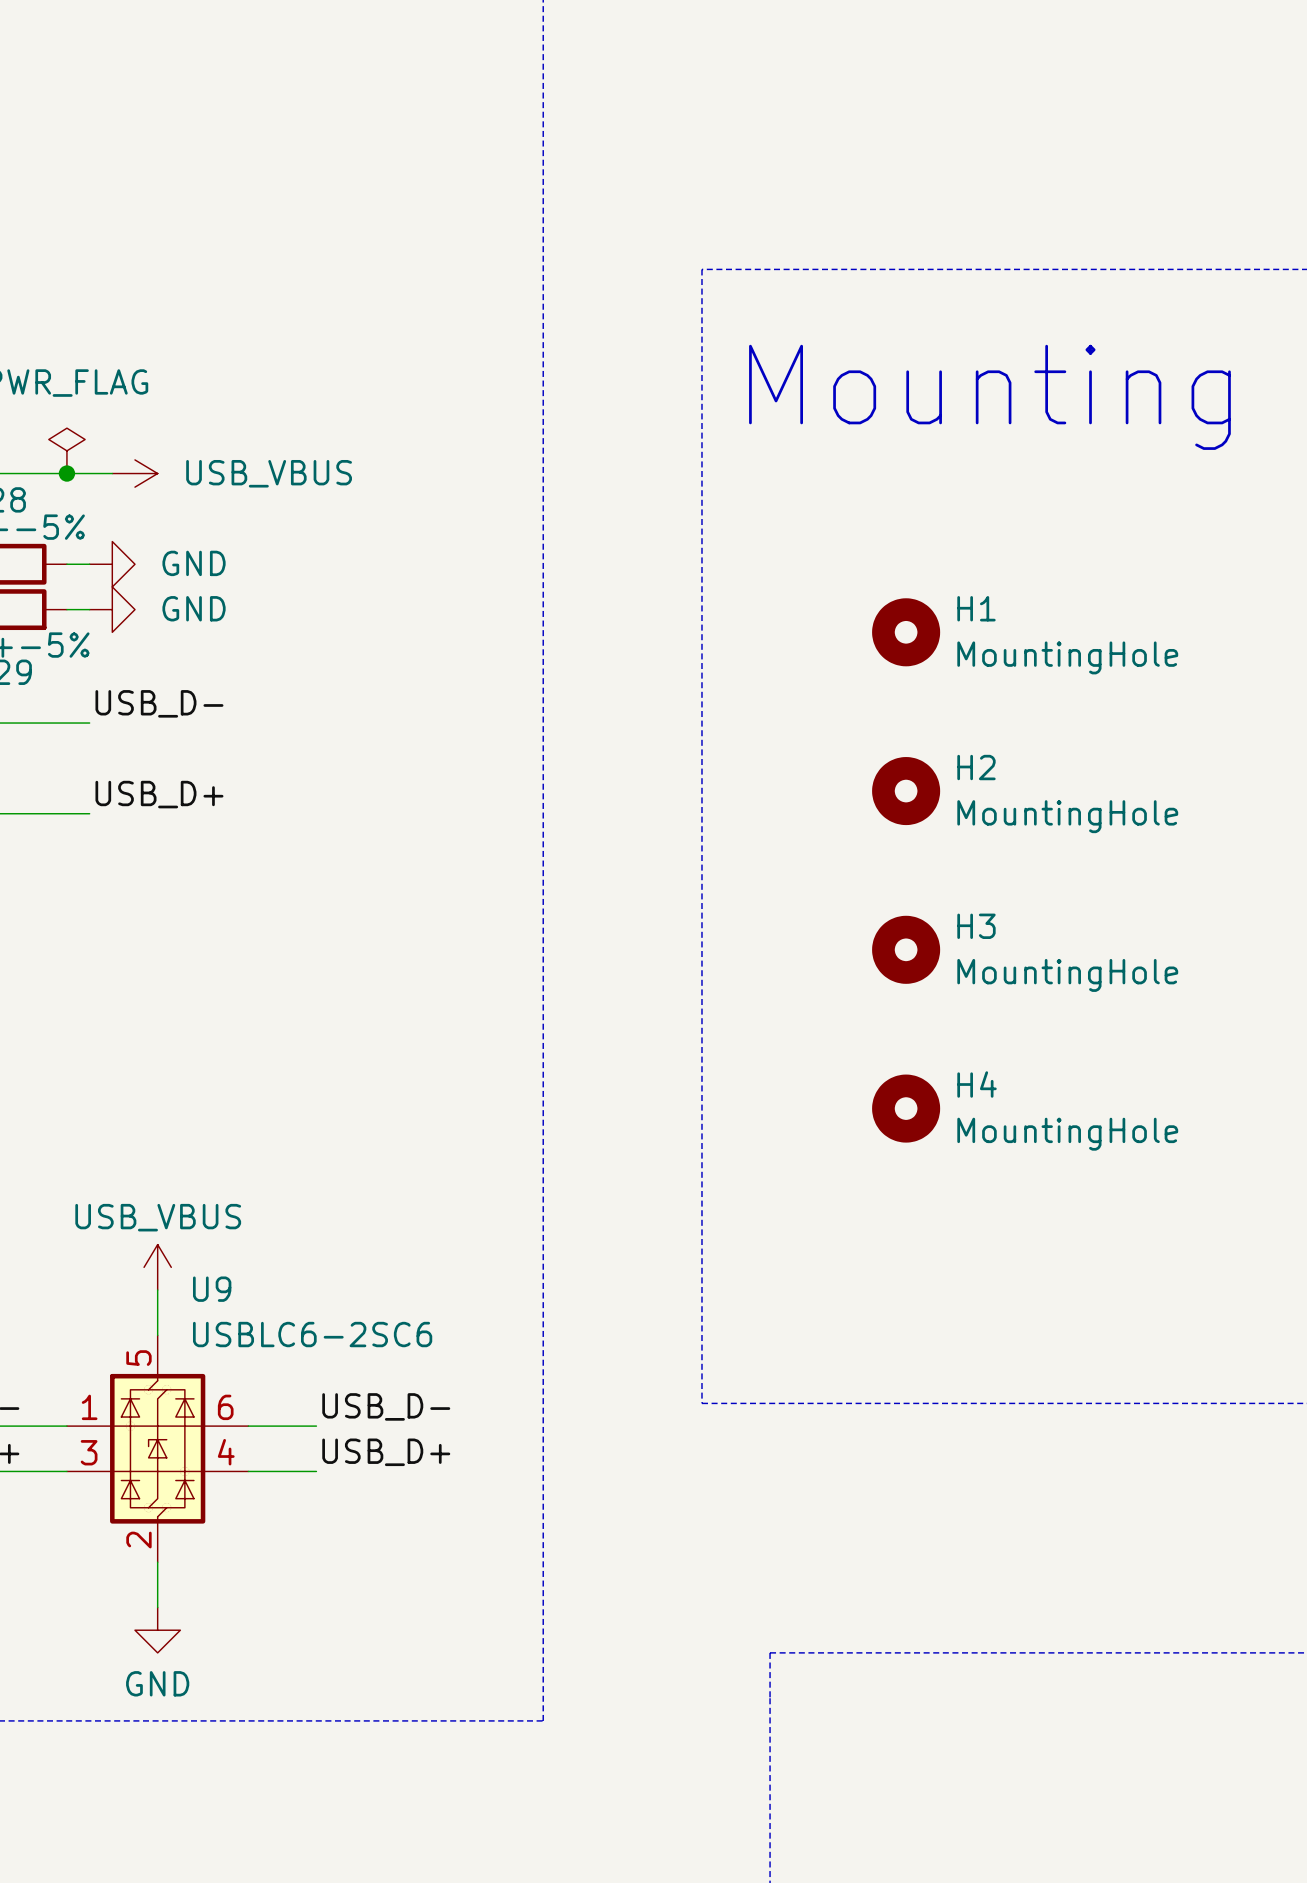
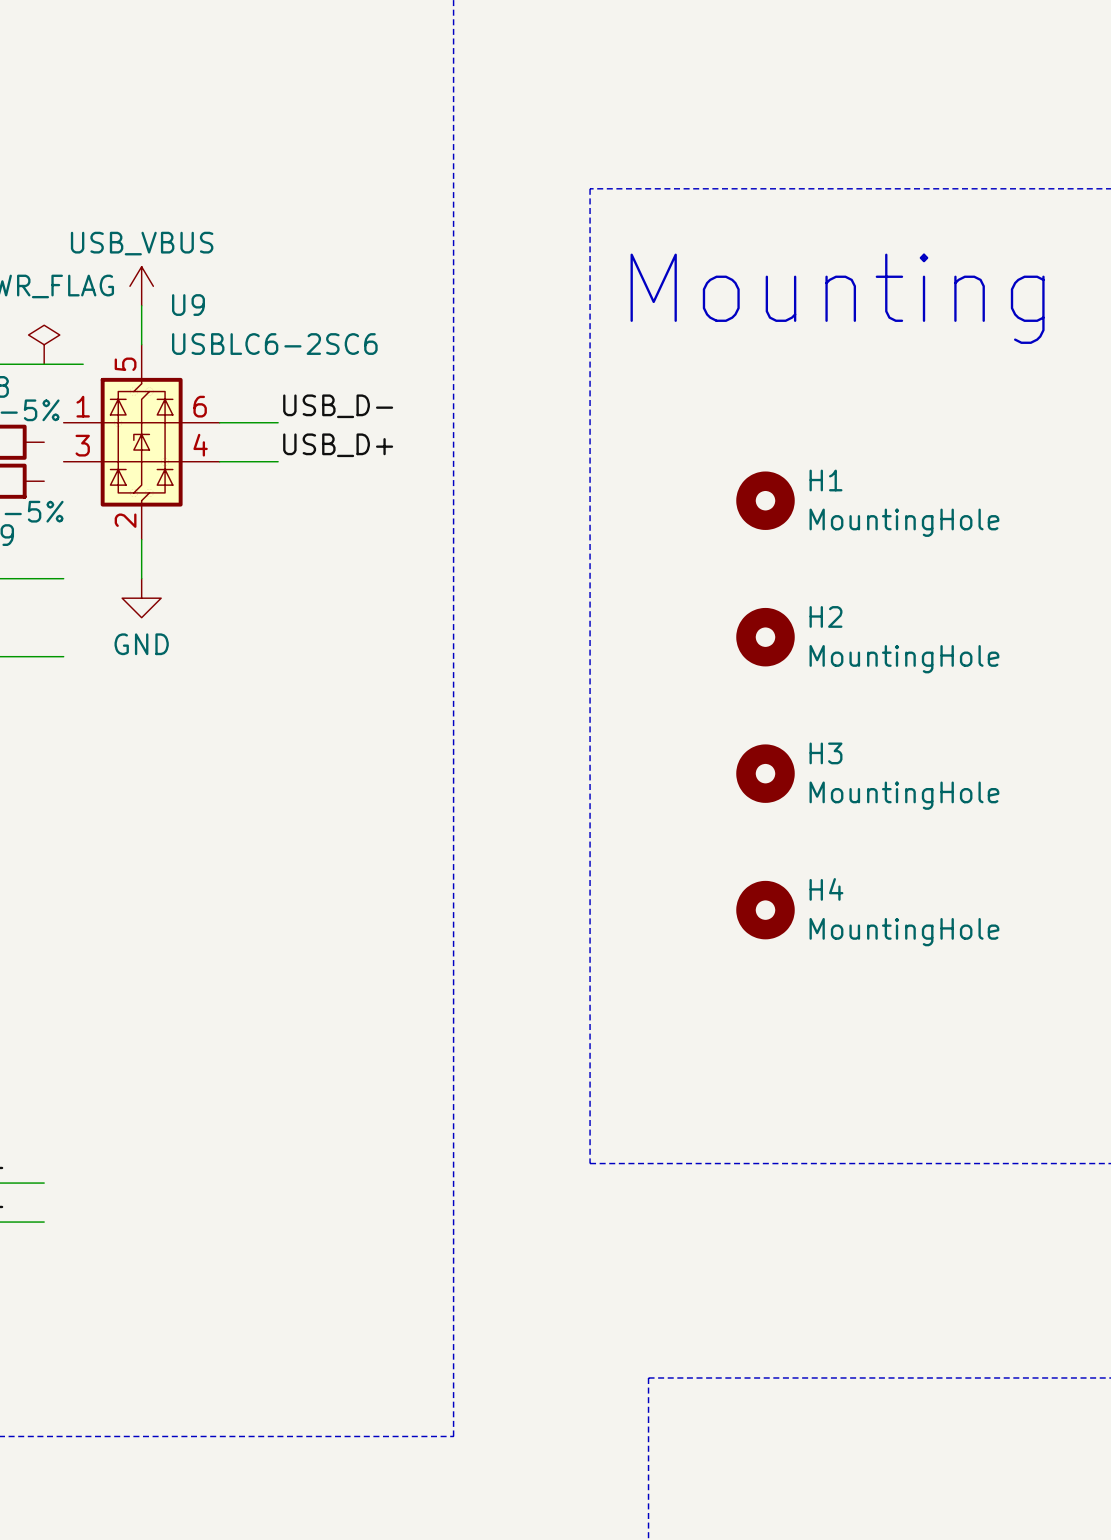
wire: none -> (141, 305) (141, 344)
junction: (66, 473) -> none
power symbol rotation: 0° (134, 473) -> 90° counterclockwise (141, 286)
power symbol position: USB_VBUS (134, 473) -> USB_VBUS (141, 286)
power symbol text position: USB_VBUS (269, 473) -> USB_VBUS (142, 243)
wire: none -> (219, 422) (278, 422)
wire: (66, 564) (89, 564) -> none
power symbol: GND (112, 564) -> none
wire: none -> (219, 461) (278, 461)
wire: (66, 609) (89, 609) -> none
power symbol: GND (112, 609) -> none
wire: none -> (141, 539) (141, 578)
label position: USB_D- (159, 703) -> USB_D- (338, 406)
power symbol: none -> GND (141, 598)
label position: USB_D+ (159, 794) -> USB_D+ (338, 445)
power symbol: USB_VBUS (157, 1267) -> none
wire: (157, 1290) (157, 1335) -> none
label: USB_D- (386, 1406) -> none
wire: (248, 1426) (316, 1426) -> none
U9 position: (157, 1448) -> (141, 442)
label: USB_D+ (386, 1452) -> none
wire: (248, 1471) (316, 1471) -> none
wire: (157, 1562) (157, 1607) -> none
power symbol: GND (157, 1630) -> none

